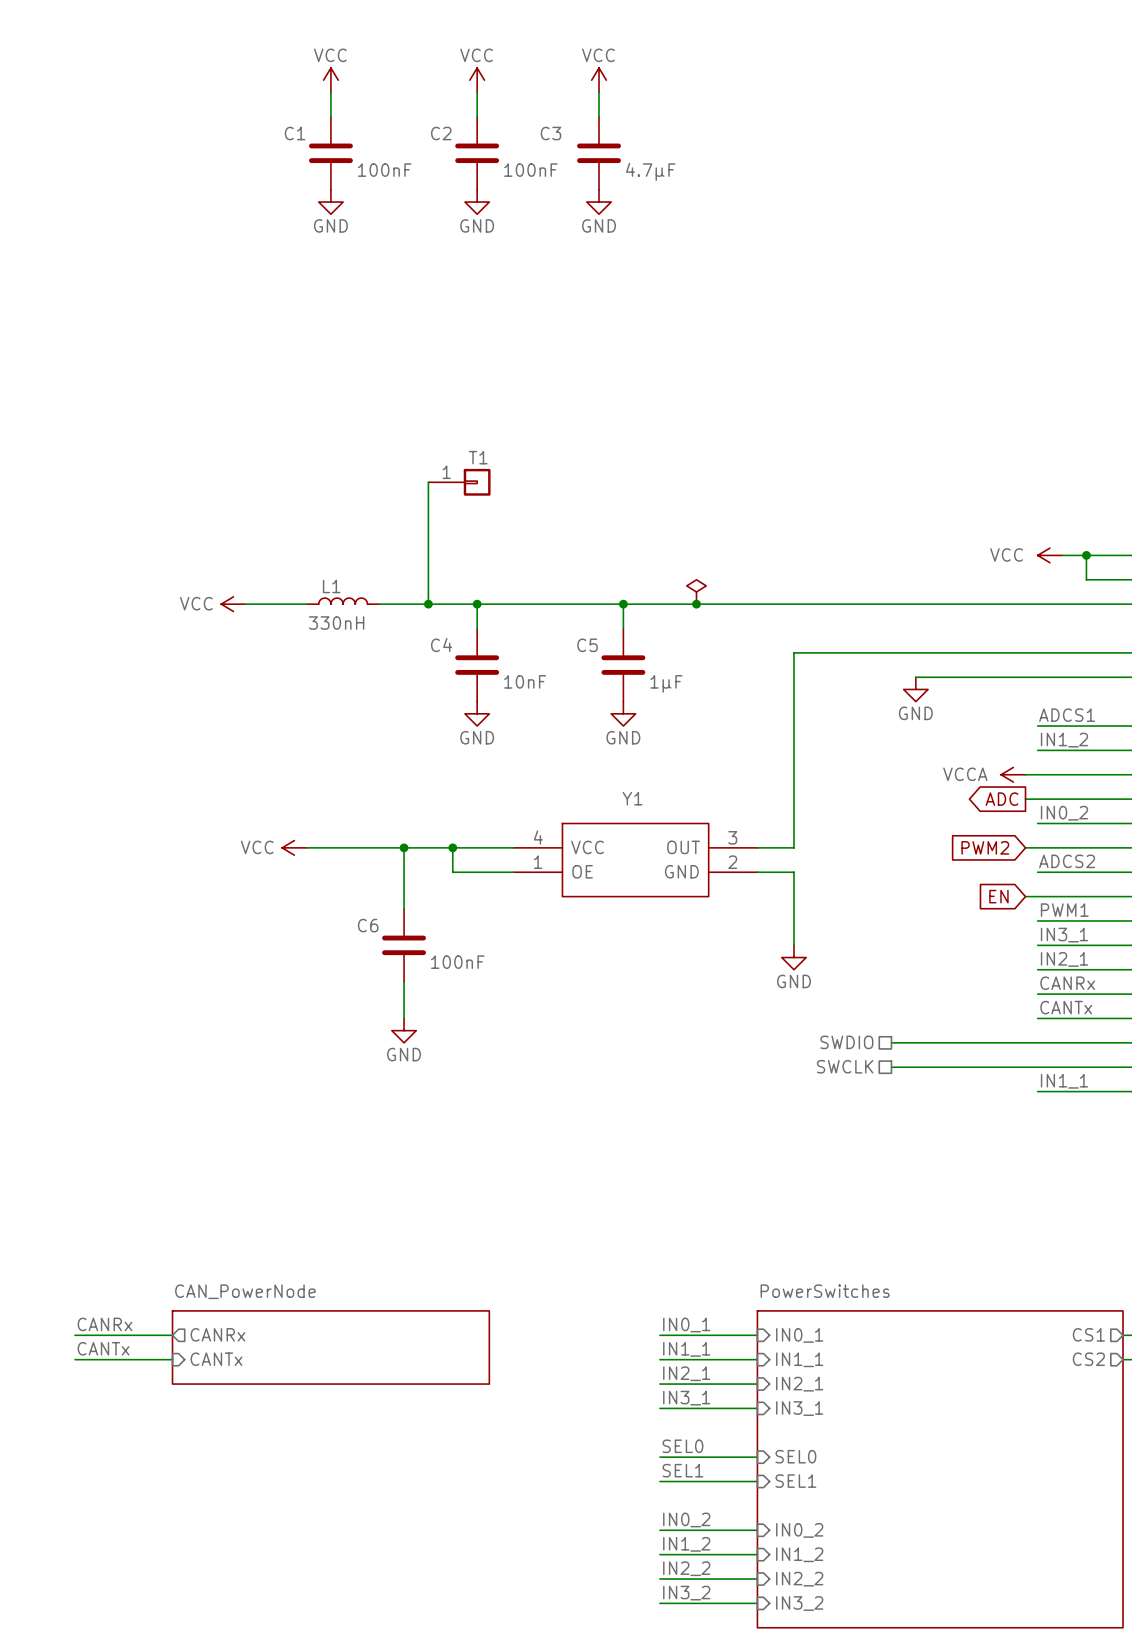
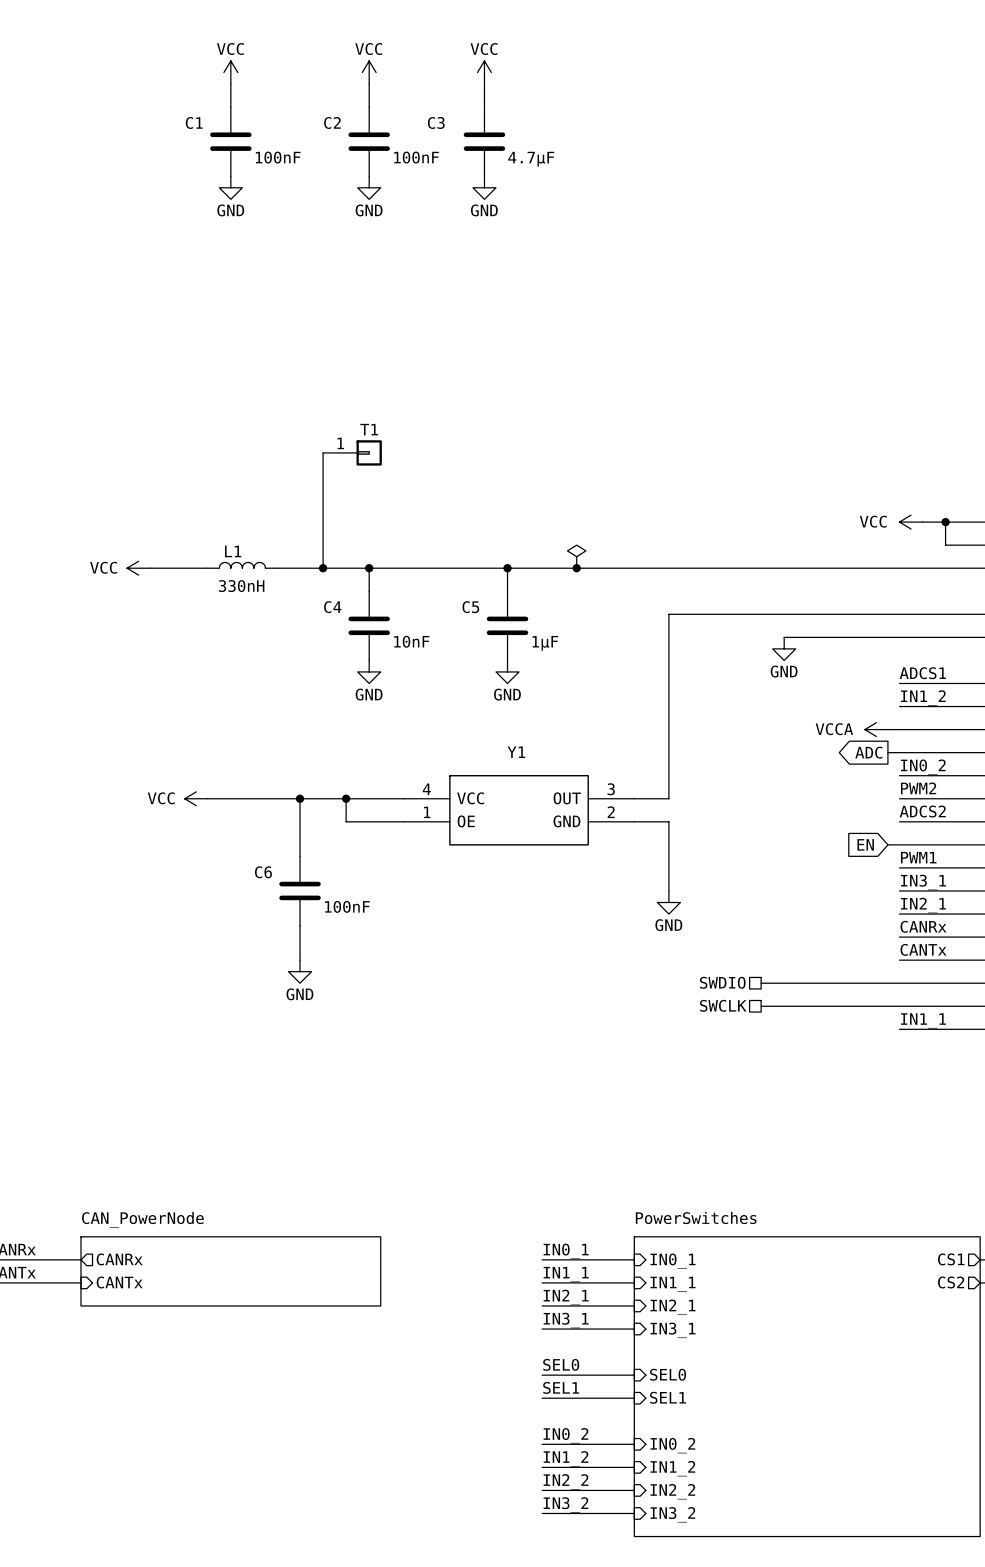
label: none -> PWM2 (918, 788)
global label: PWM2 (985, 847) -> none
wire: (1025, 847) (1037, 847) -> none

